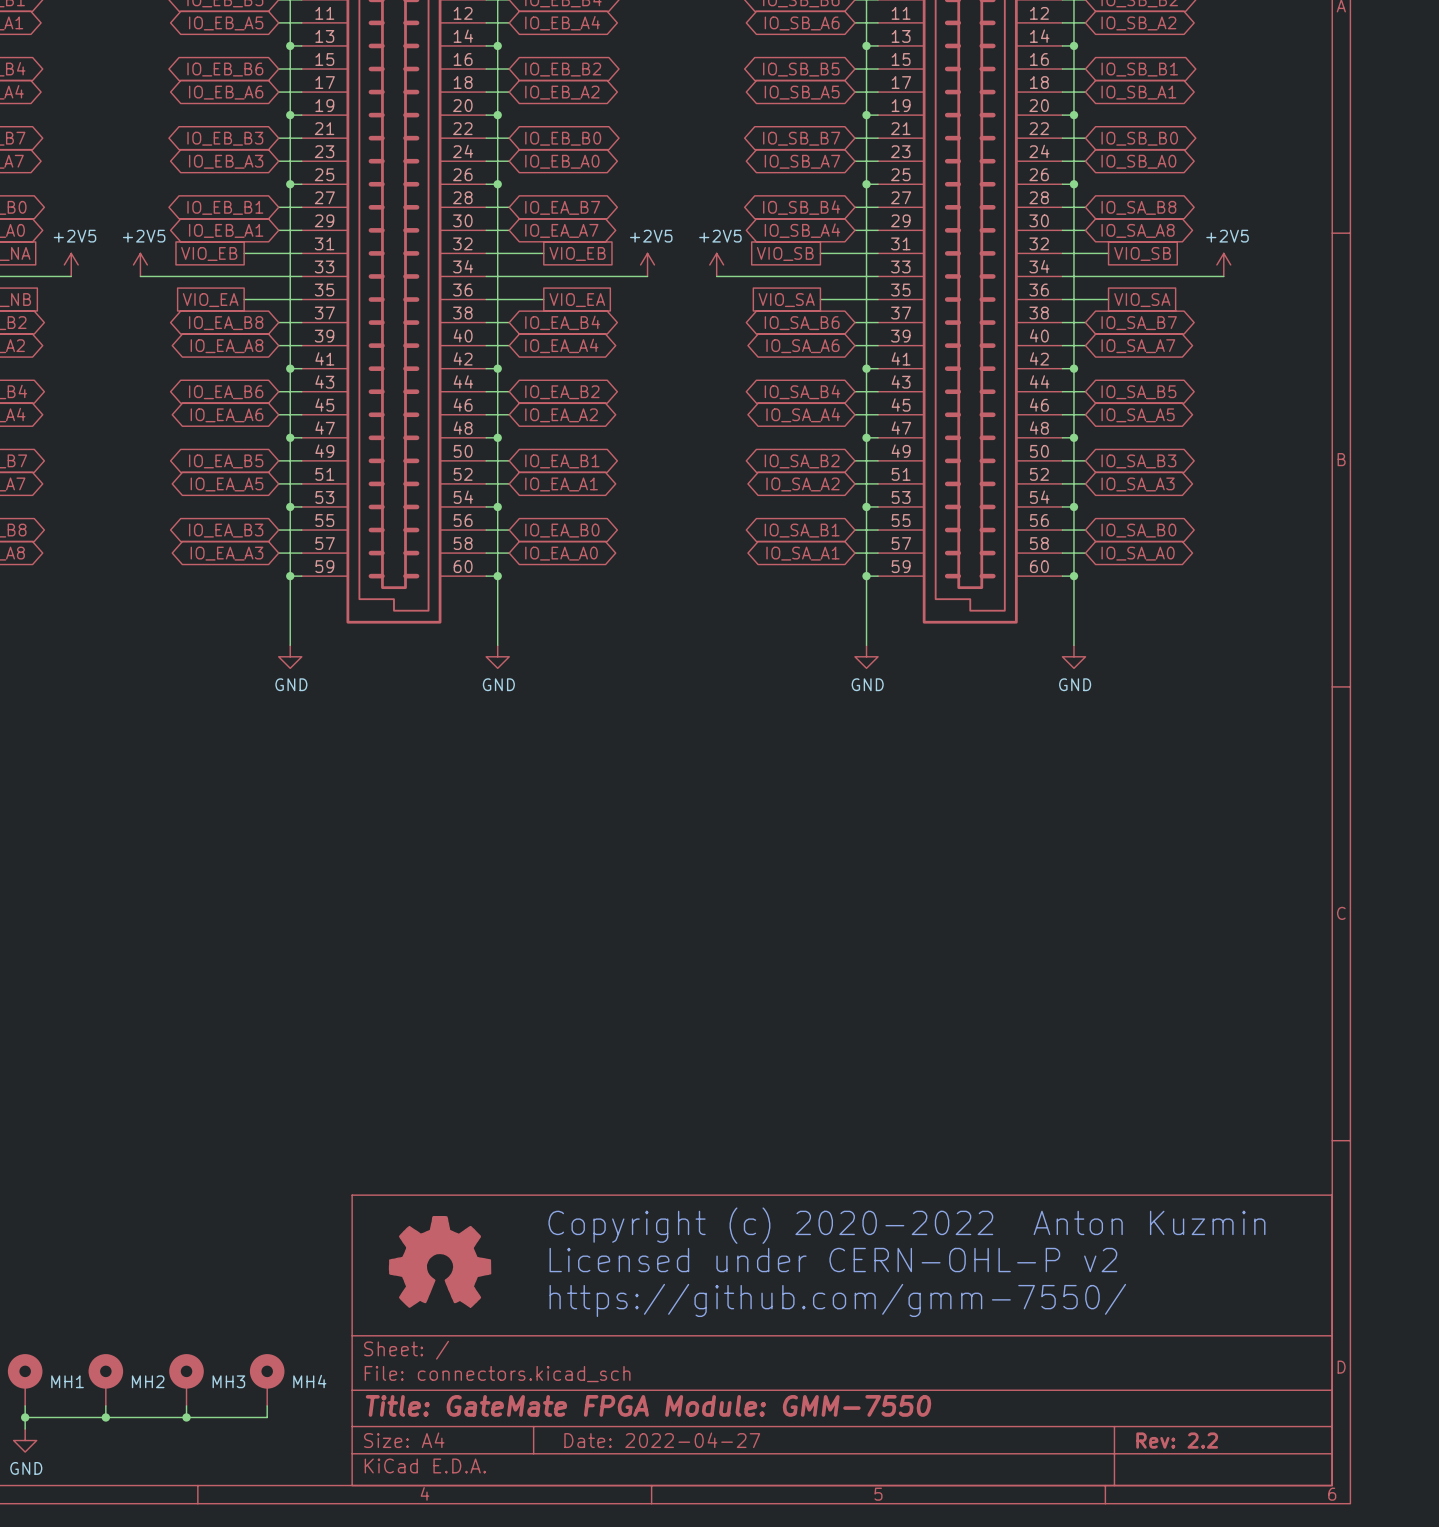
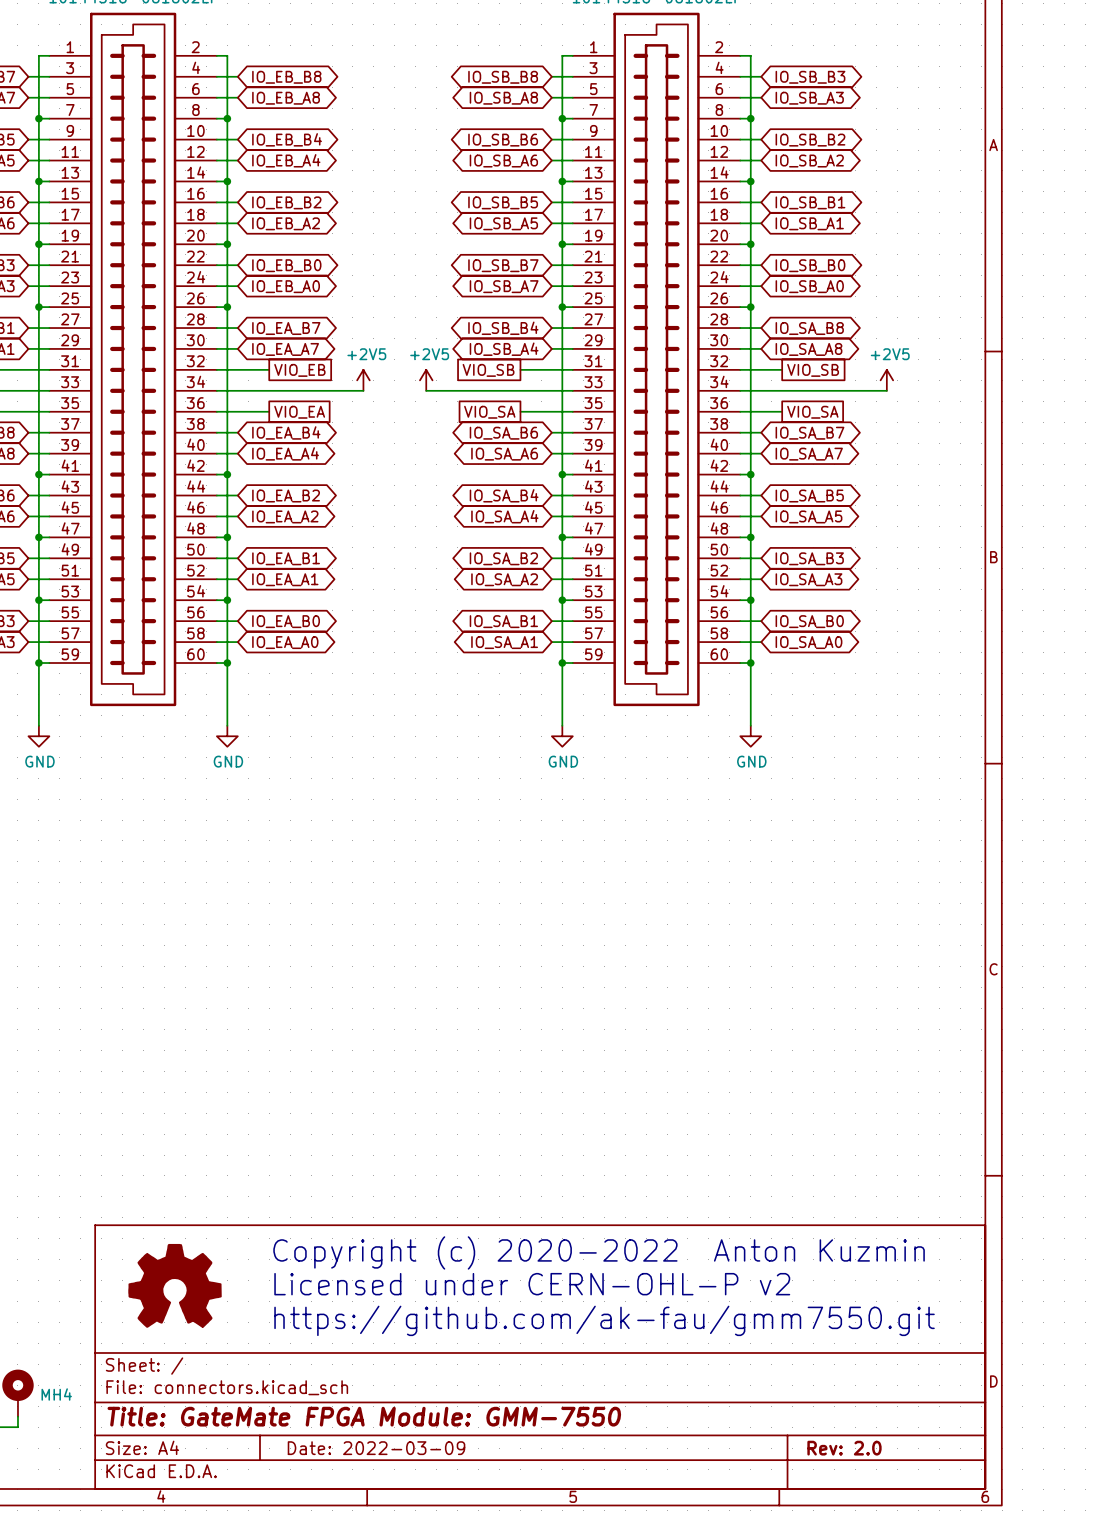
text: https://github.com/gmm-7550/ (837, 1300) -> https://github.com/ak-fau/gmm7550.git (604, 1320)
title block: Date: 2022-04-27 (662, 1440) -> Date: 2022-03-09 (376, 1448)
title block: Rev: 2.2 (1177, 1440) -> Rev: 2.0 (844, 1448)

